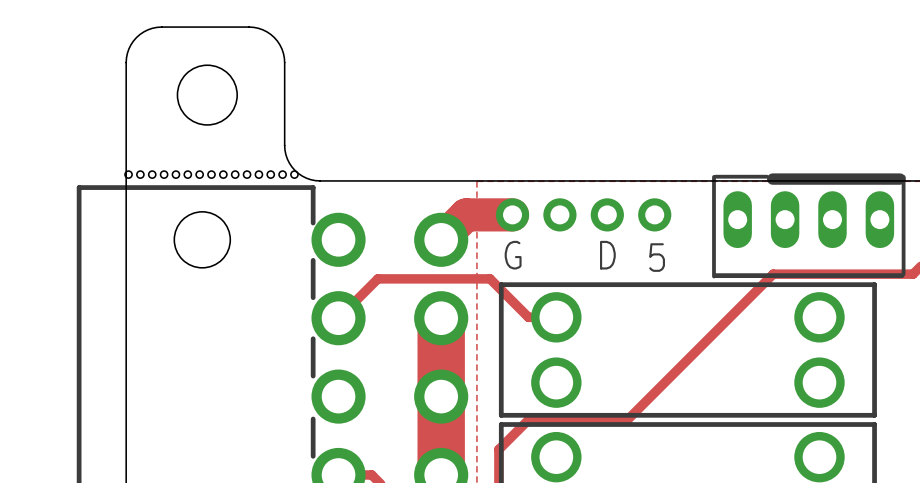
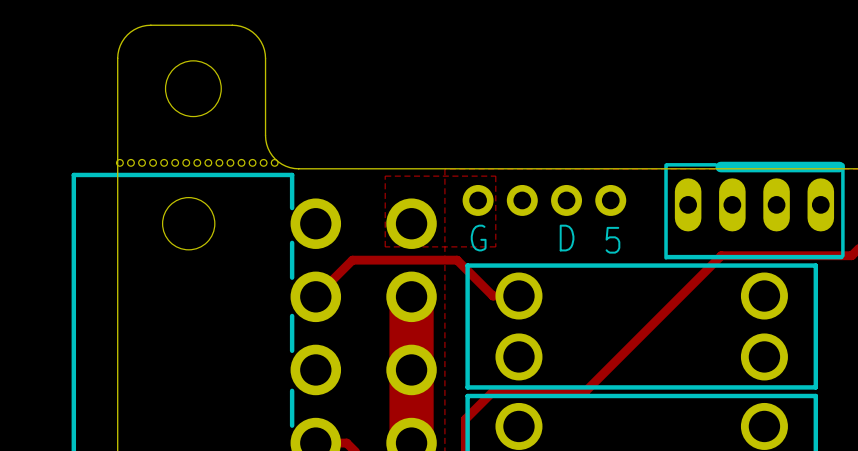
zone outline: none -> (385, 176) (385, 246) (495, 246) (495, 176) (385, 176)
track: (512, 214) (466, 214) (441, 239) -> none

